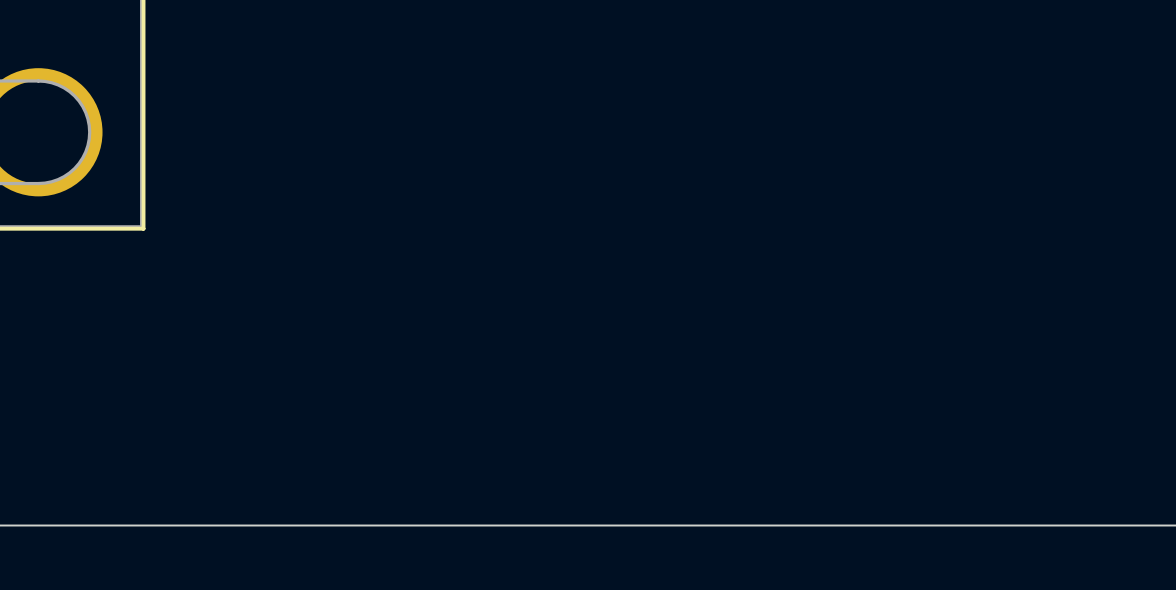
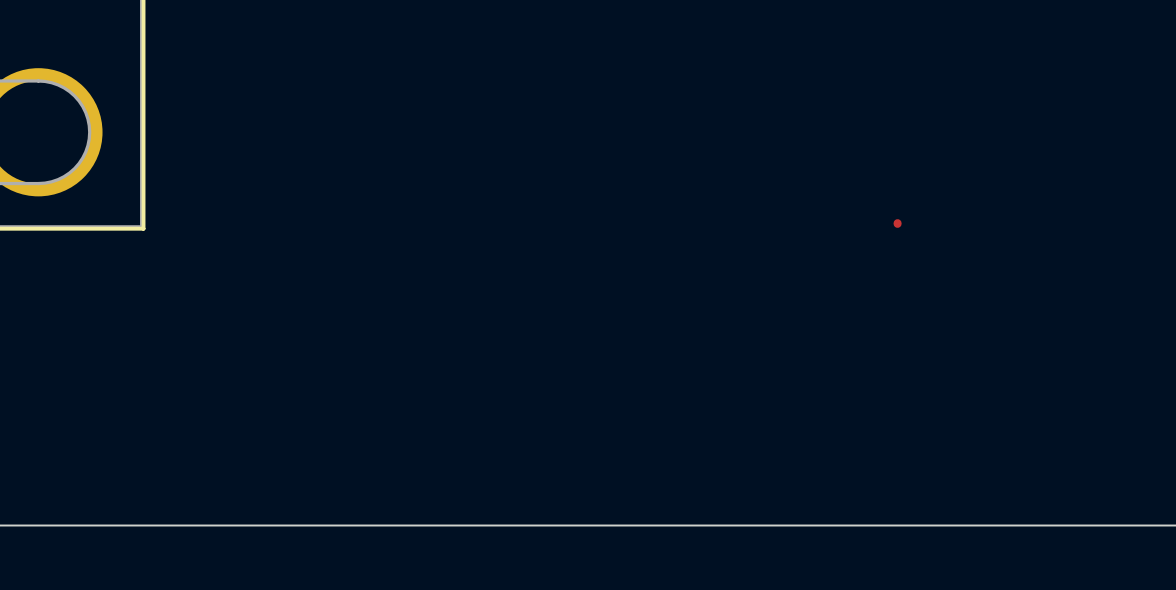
track: none -> (897, 223) (897, 223)

